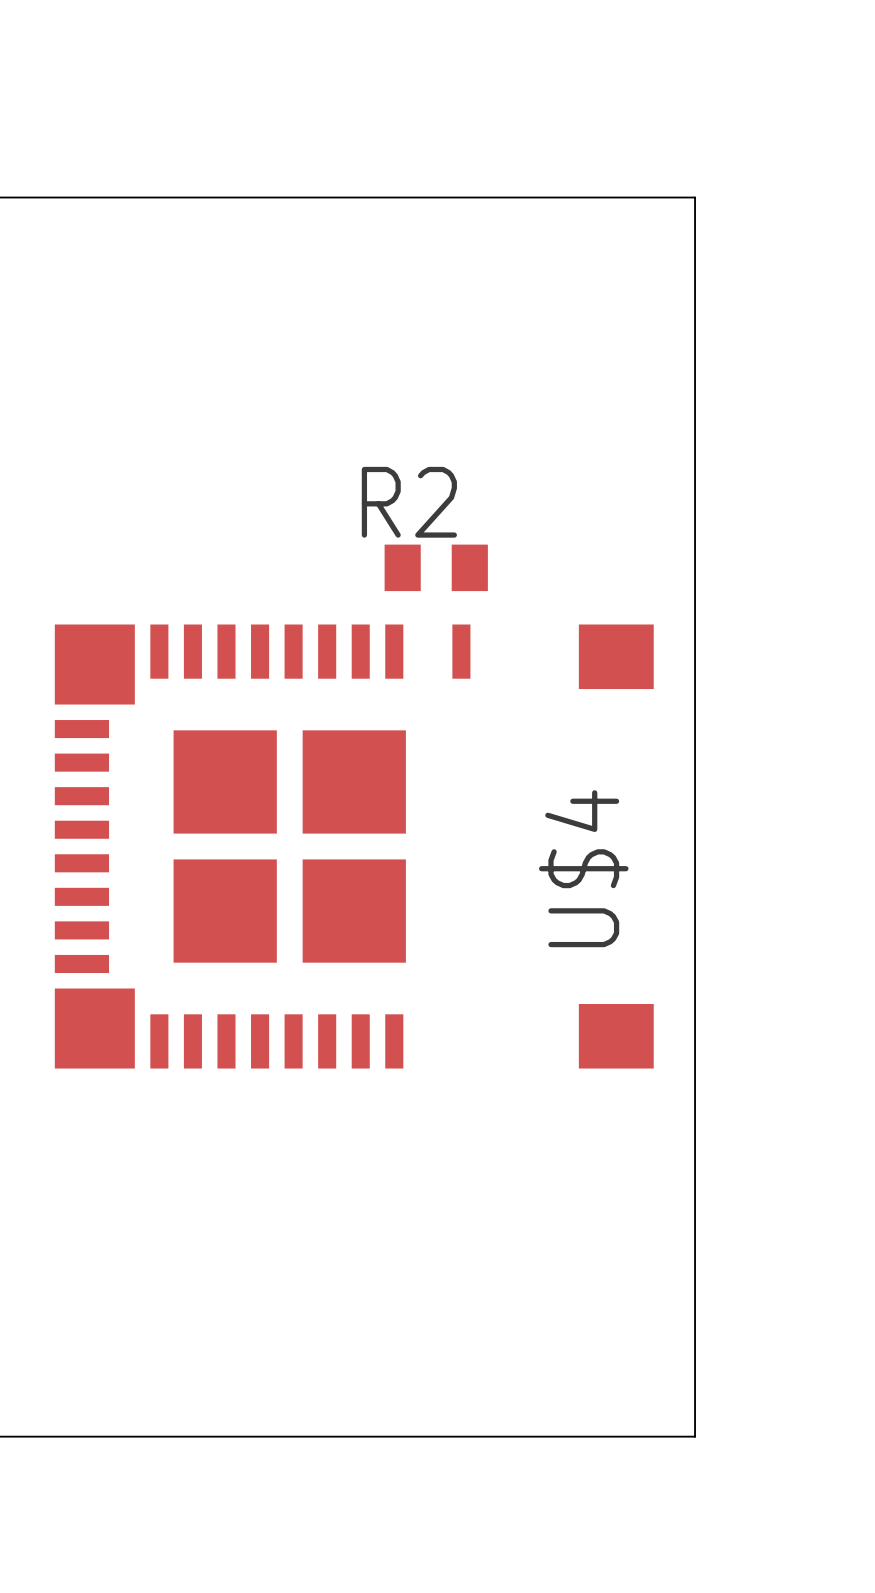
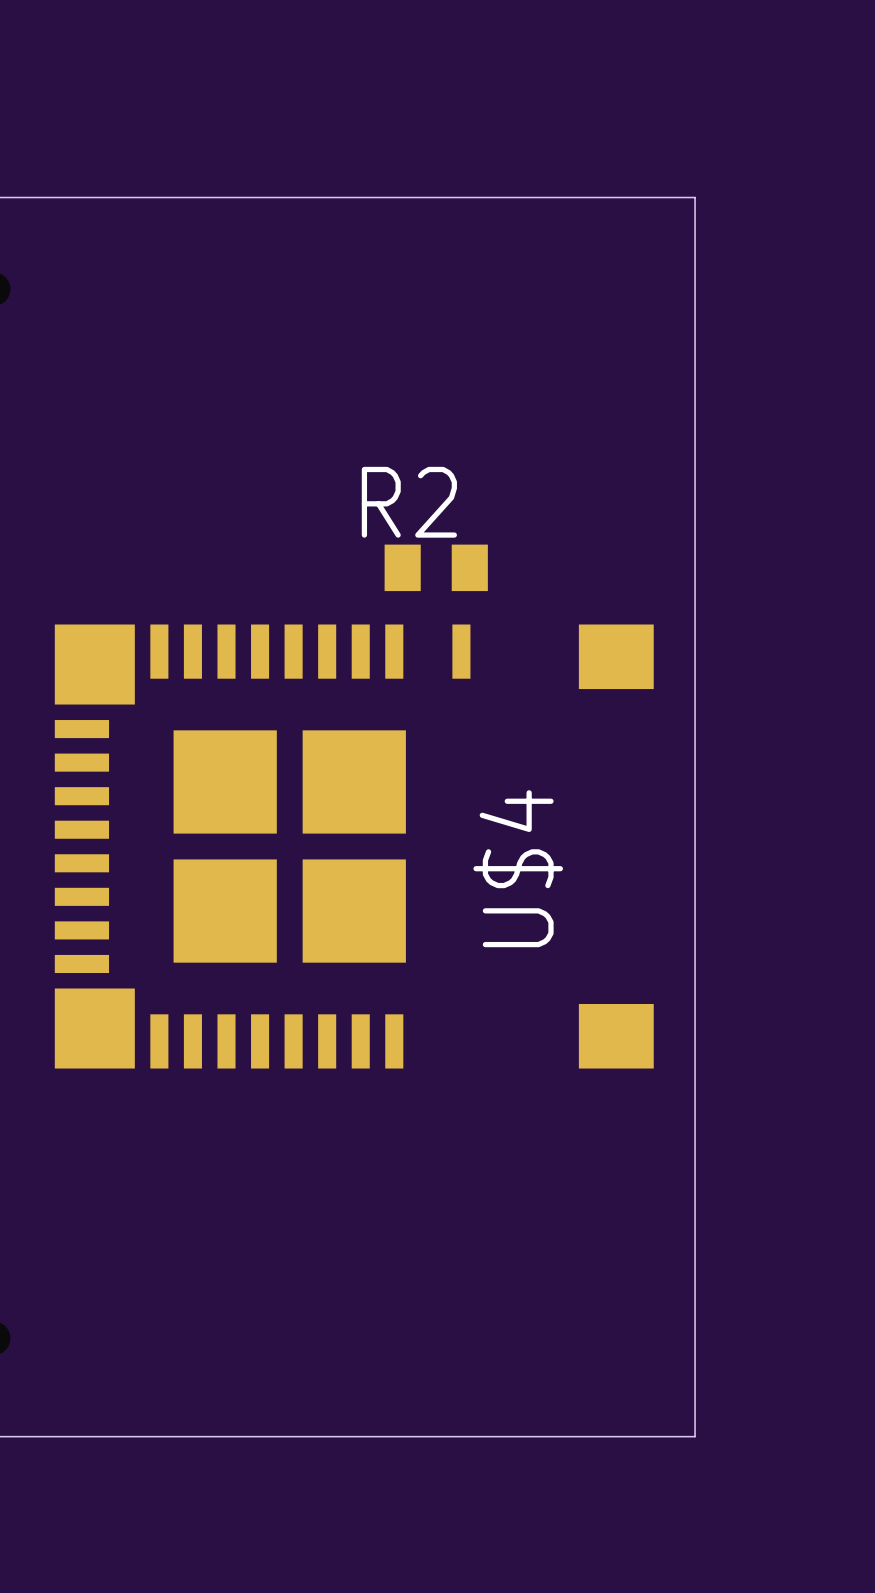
U$4 name position: U$4 (583, 868) -> U$4 (518, 868)

